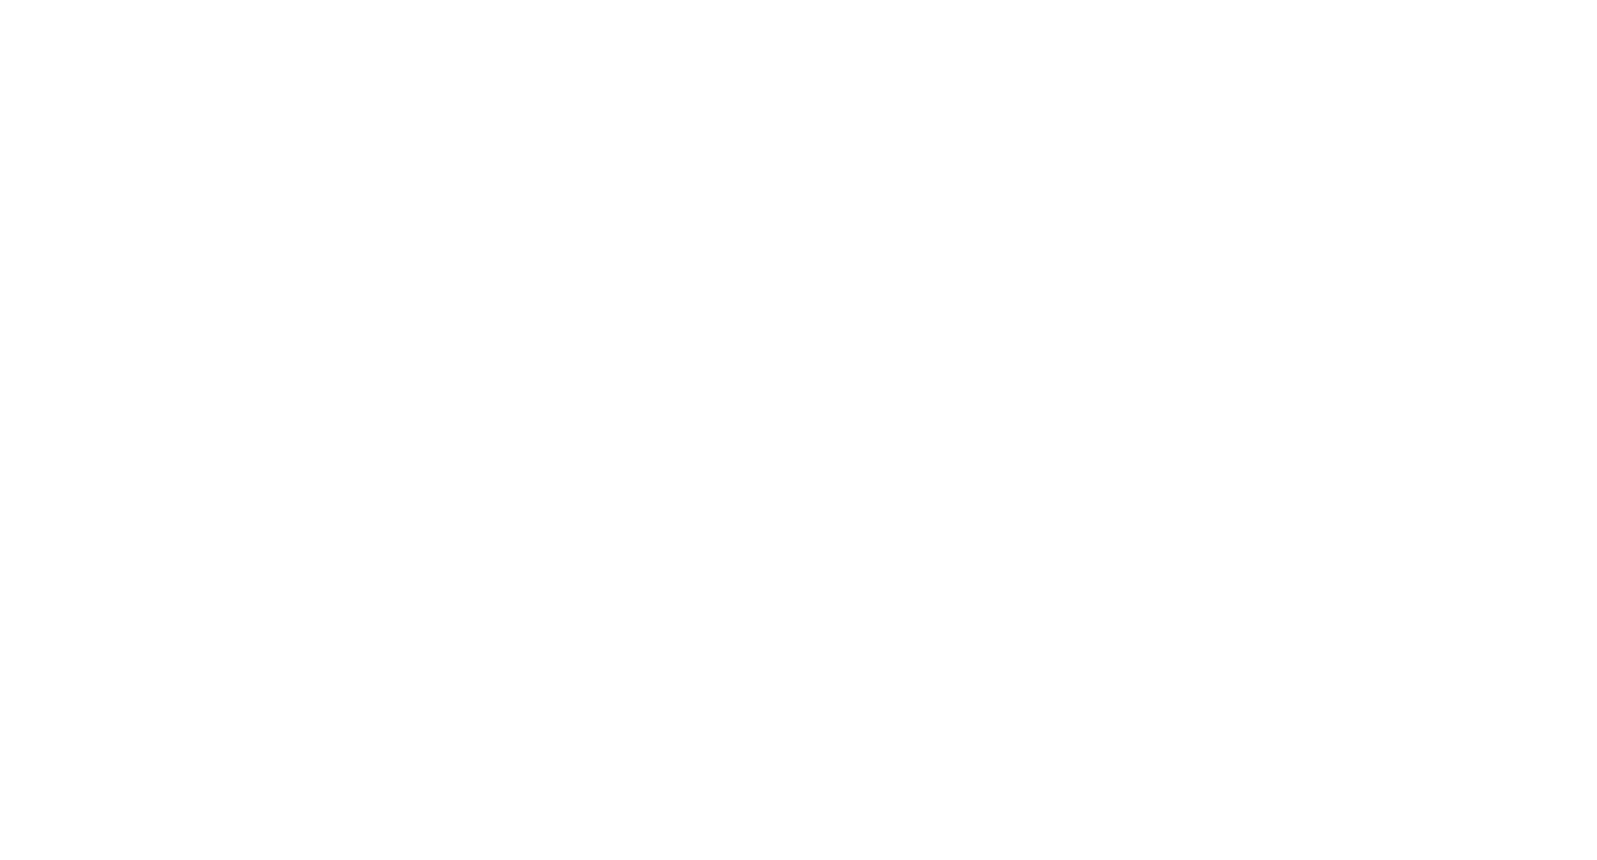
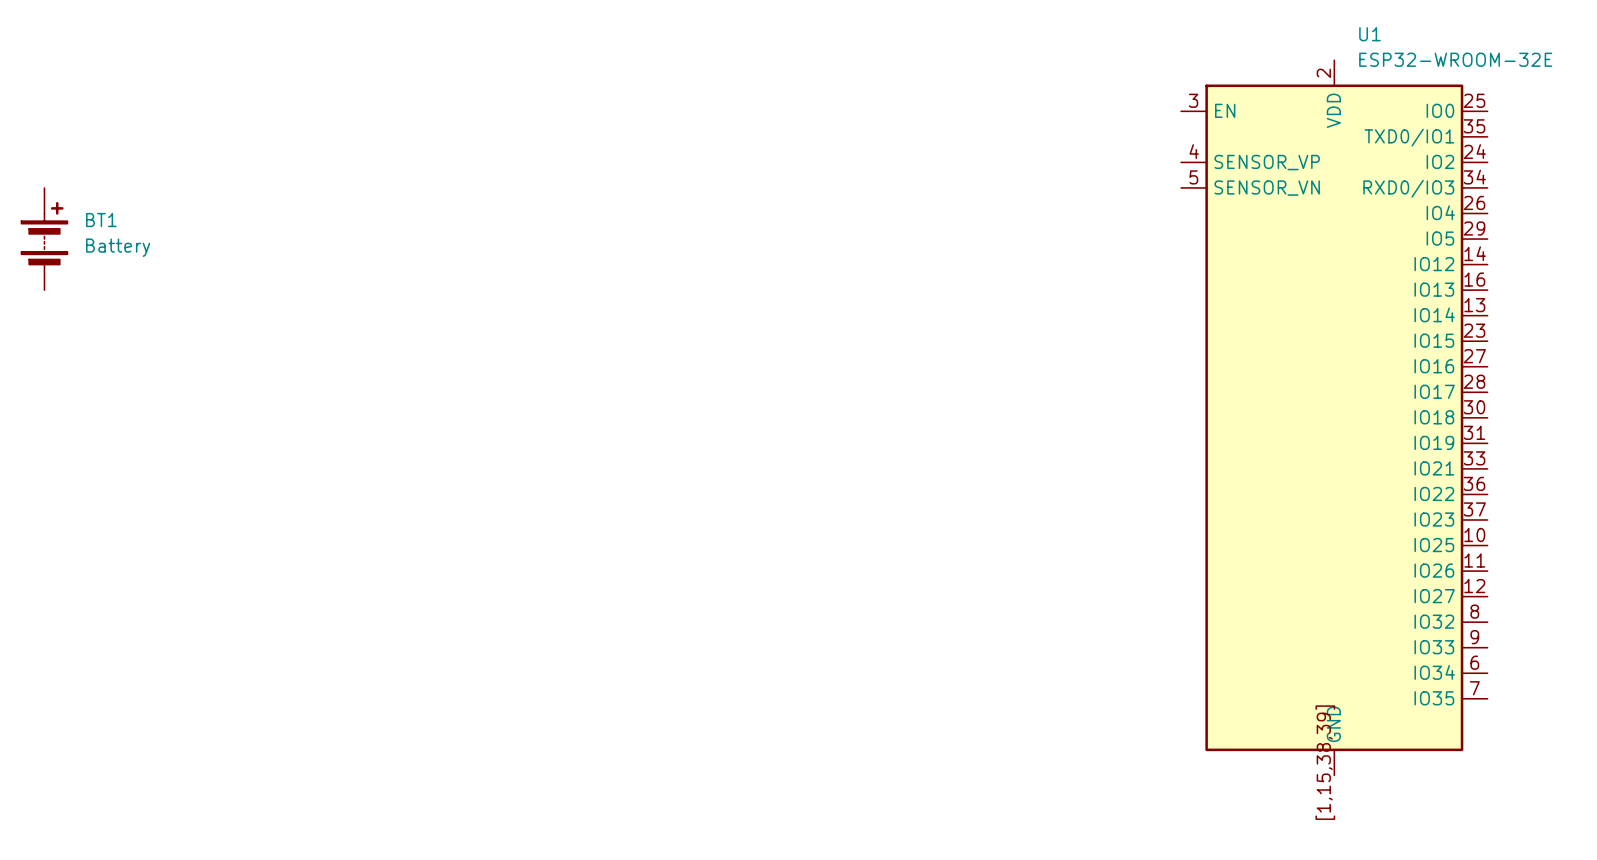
BT1: none -> Battery (44, 239)
U1: none -> ESP32-WROOM-32E (1334, 417)

